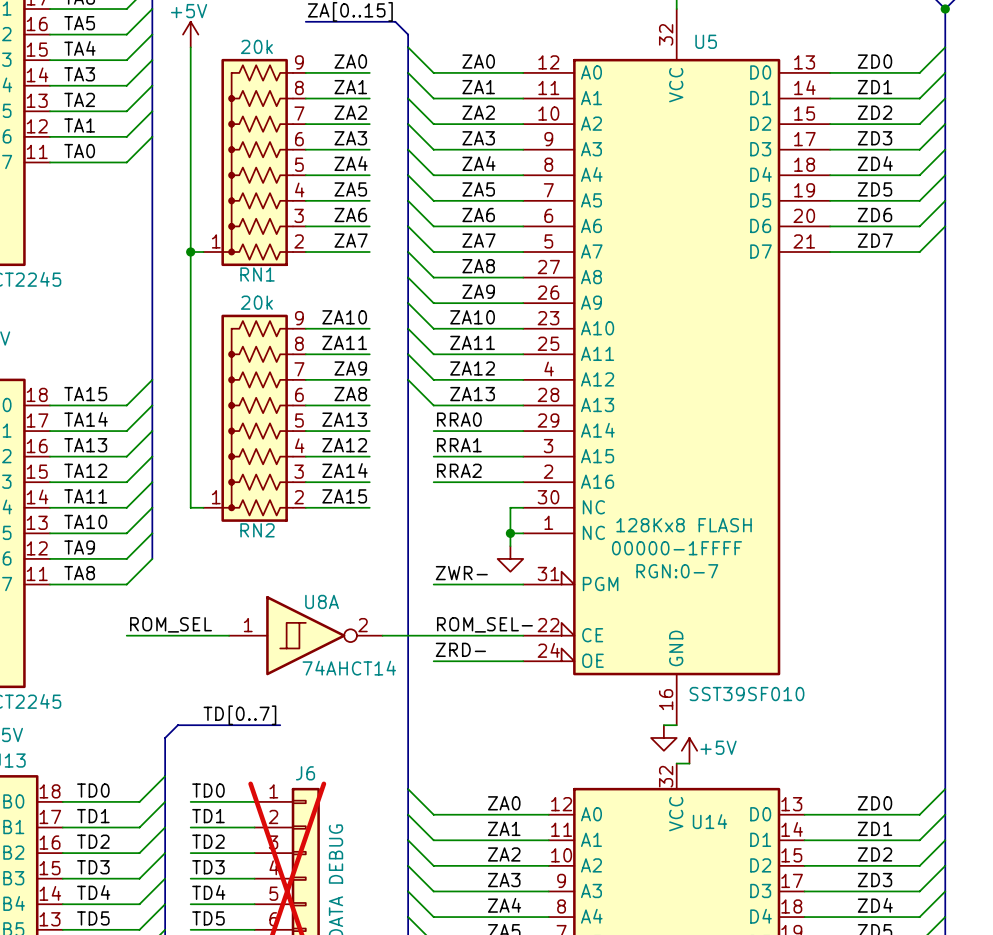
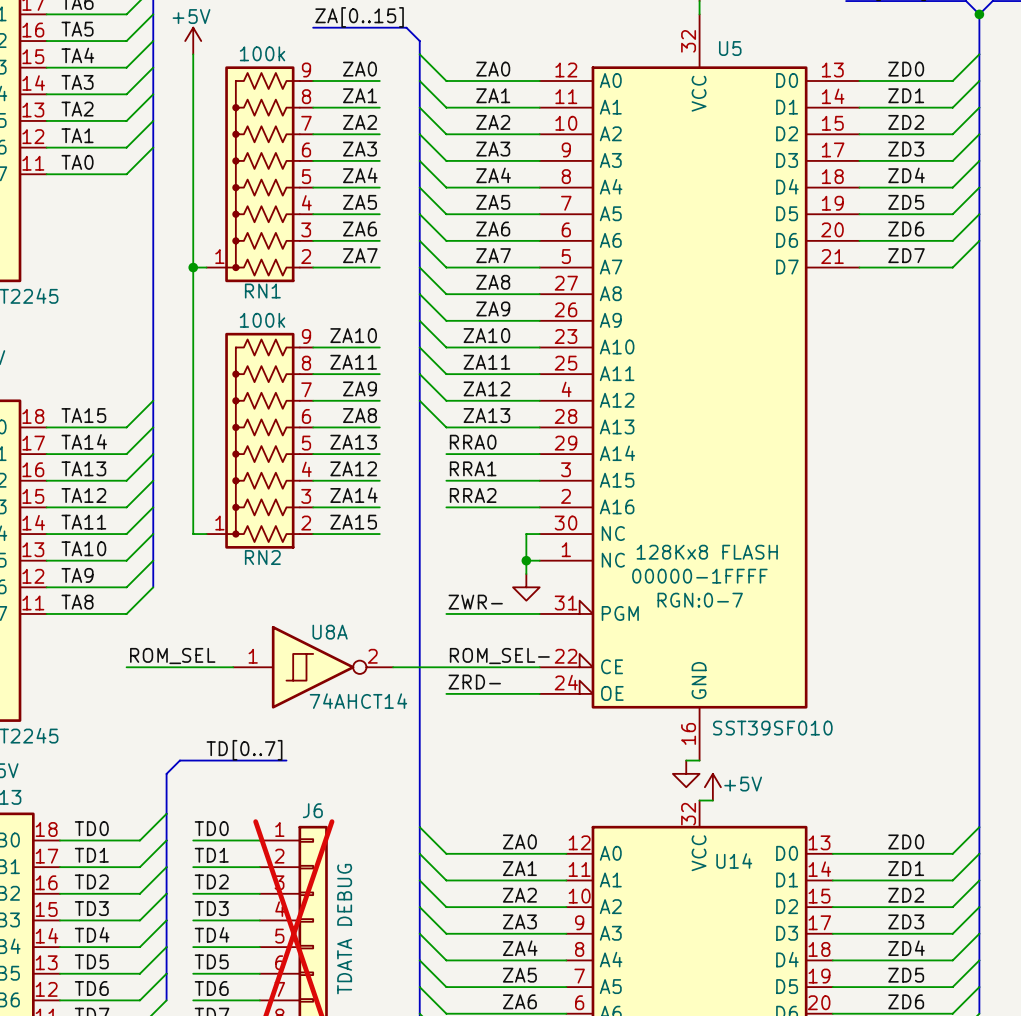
RN1 value: 20k (256, 46) -> 100k (262, 53)
RN2 value: 20k (256, 302) -> 100k (262, 320)

